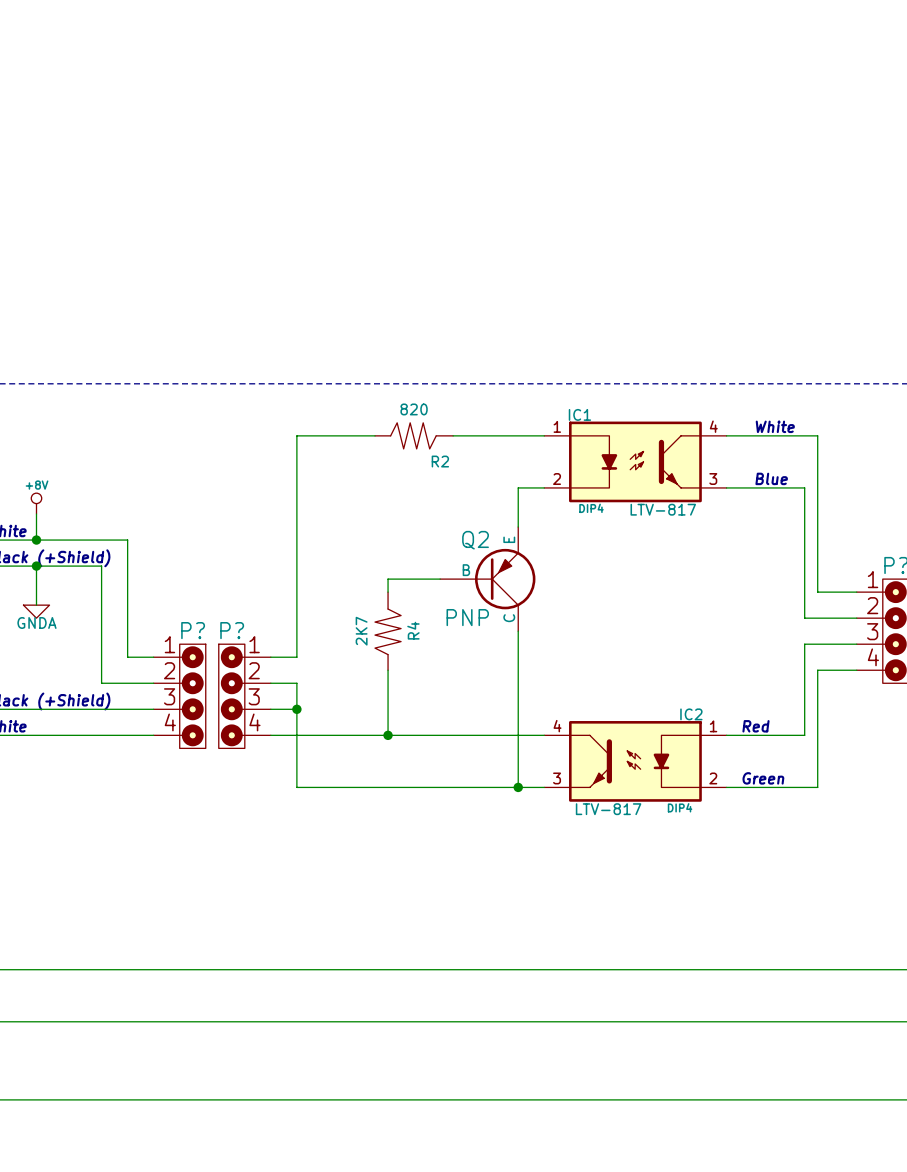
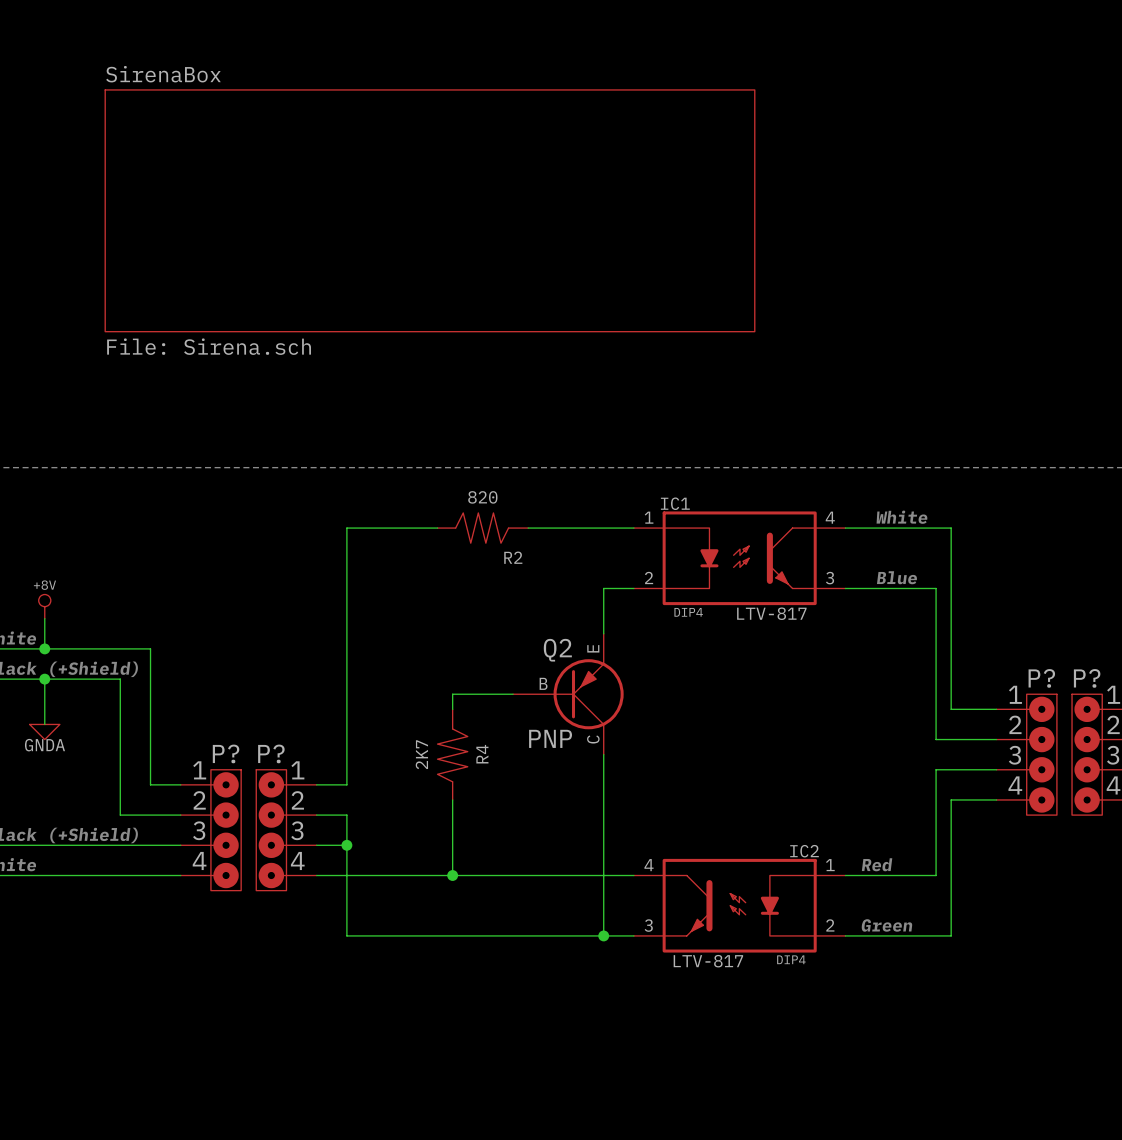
sheet SirenaBox: none -> File: Sirena.sch (429, 210)

